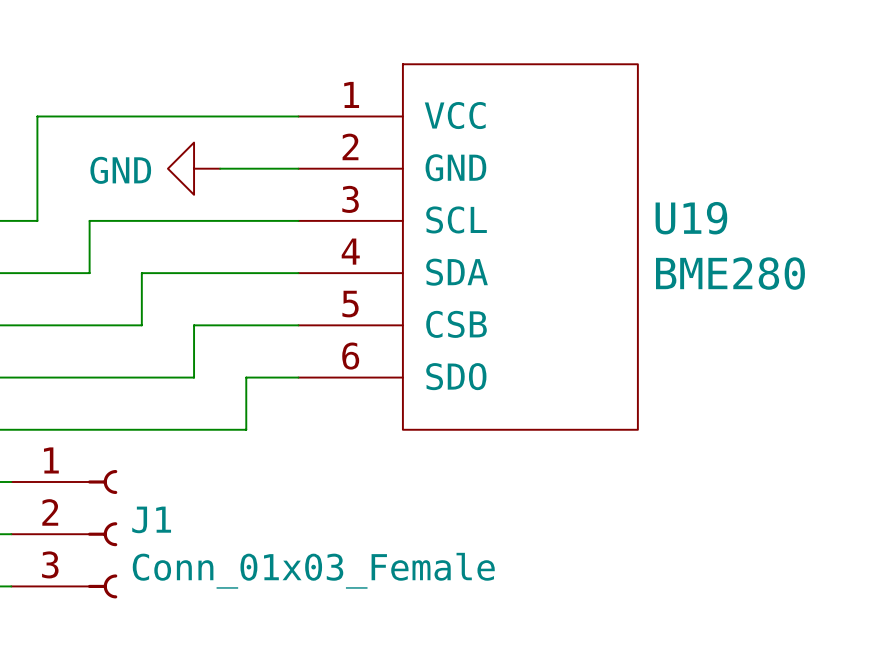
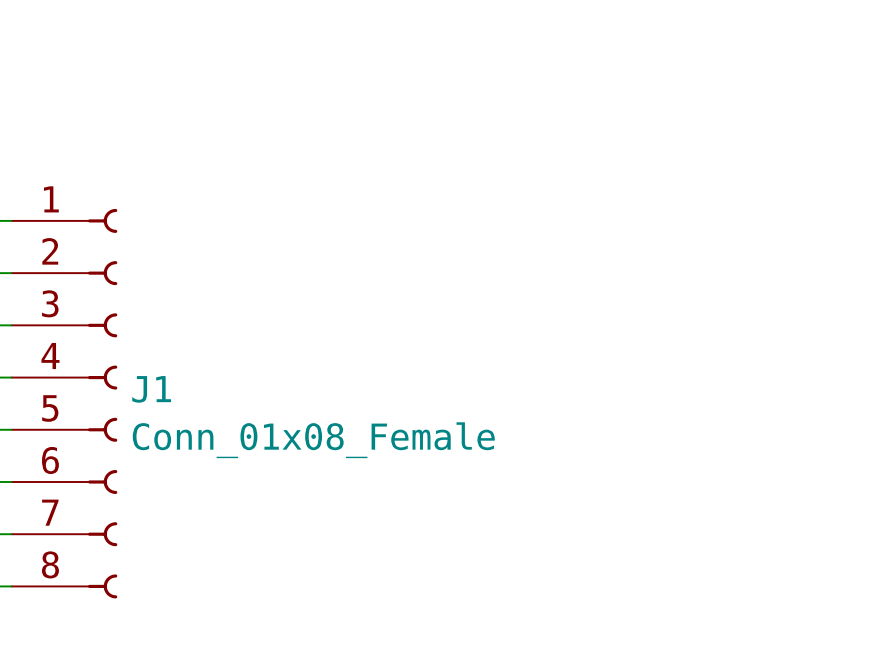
wire: (298, 116) (37, 116) (37, 220) (11, 220) -> none
power symbol: GND (194, 168) -> none
wire: (220, 168) (298, 168) -> none
wire: (298, 220) (89, 220) (89, 273) (11, 273) -> none
U19: BME280 (468, 247) -> none
wire: (298, 273) (141, 273) (141, 325) (11, 325) -> none
wire: (298, 325) (194, 325) (194, 377) (11, 377) -> none
wire: (298, 377) (246, 377) (246, 429) (11, 429) -> none
J1 symbol: [11, 469, 118, 599] -> [11, 208, 118, 599]
J1 value: Conn_01x03_Female (313, 570) -> Conn_01x08_Female (313, 440)

